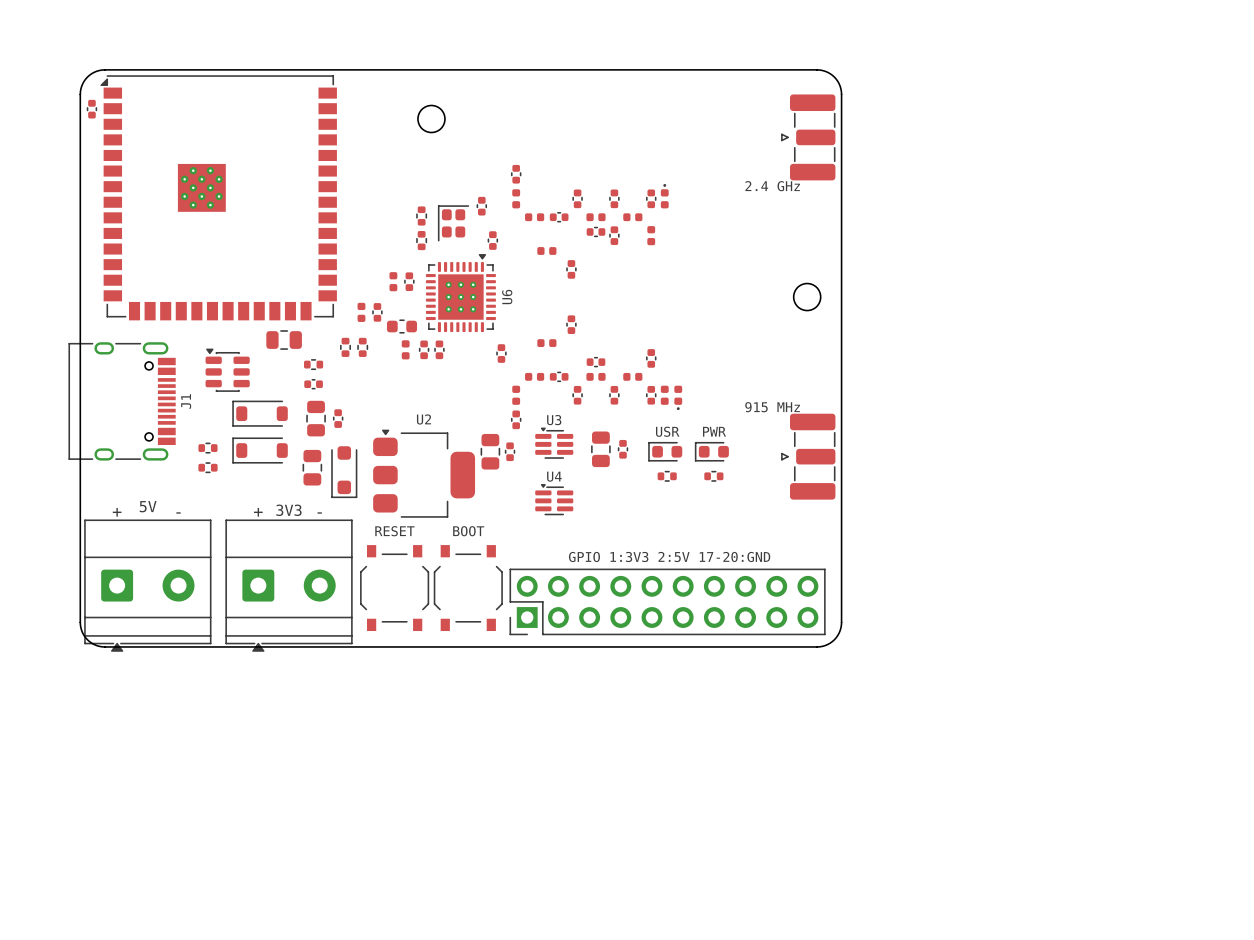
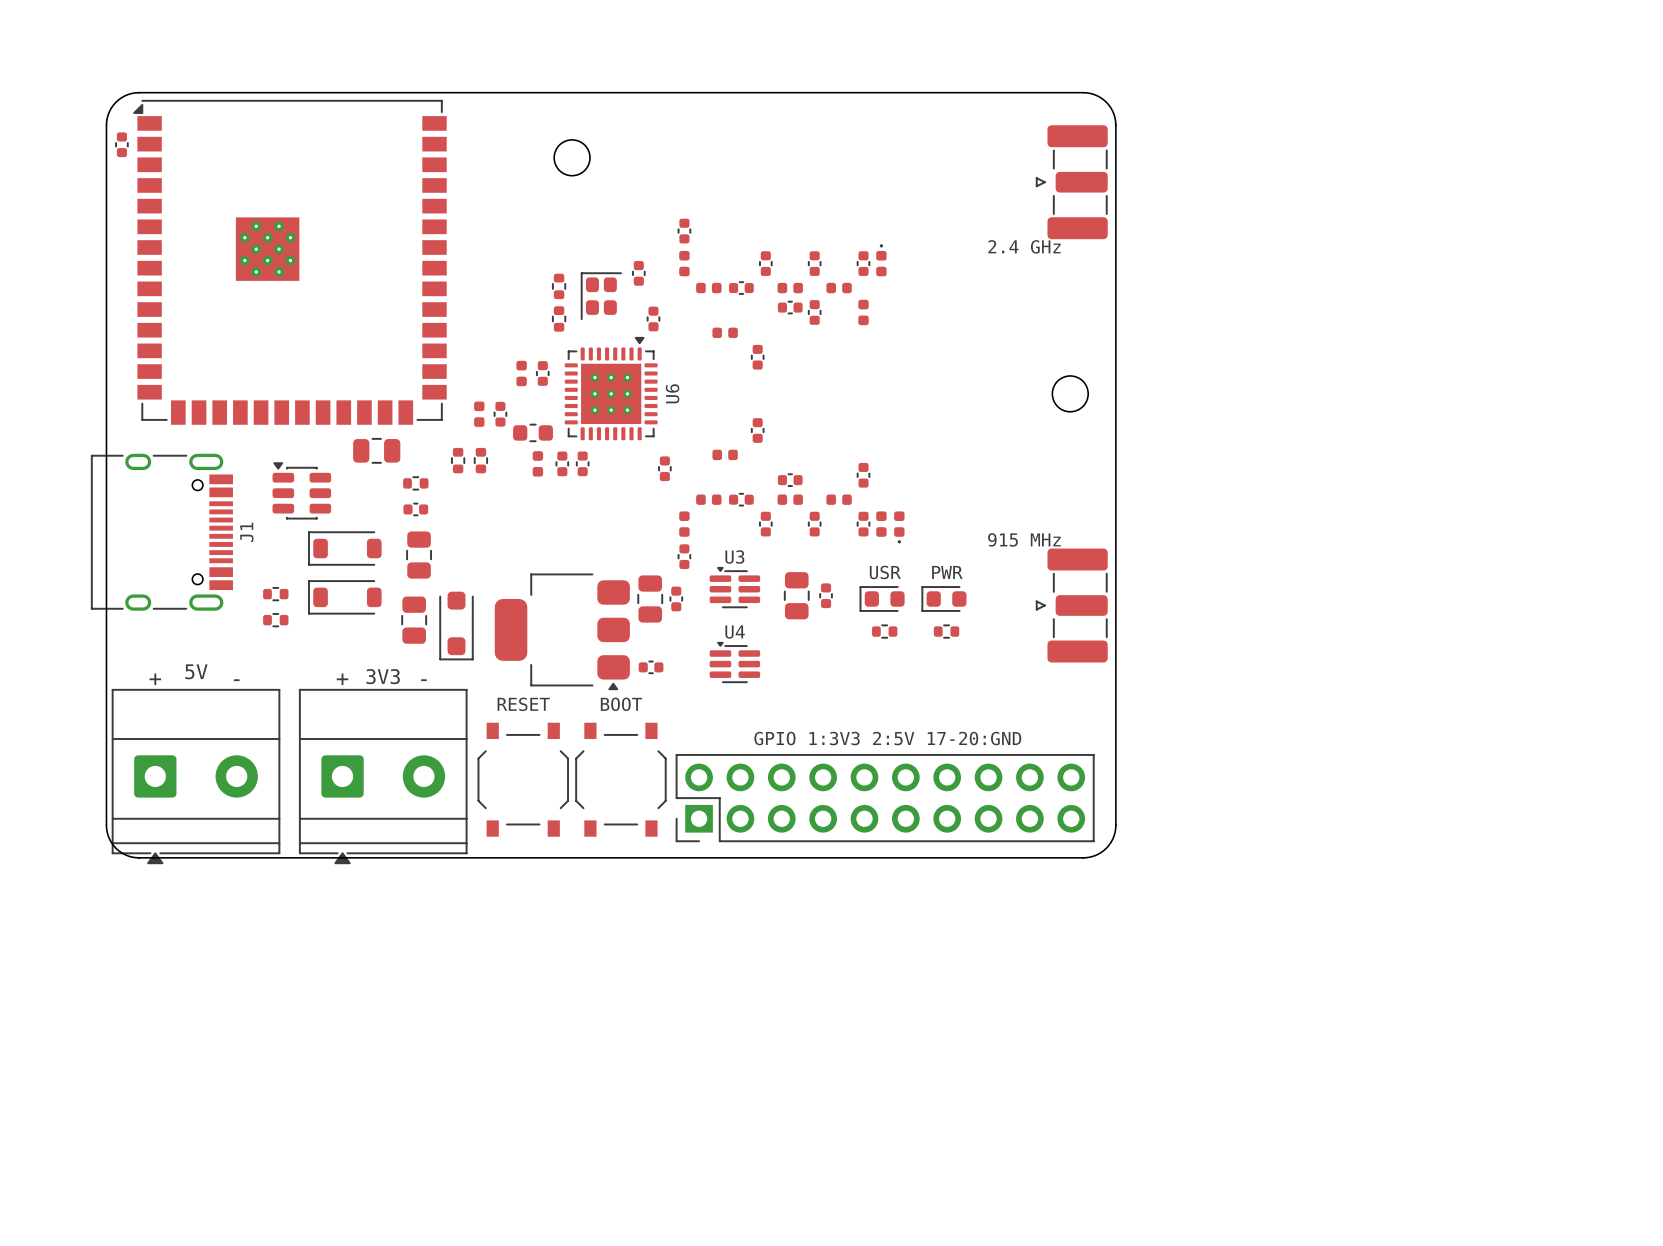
part rotation: 0° (338, 418) -> 90° clockwise (651, 667)
part position: (338, 418) -> (651, 667)
U2: (424, 473) -> none
part: none -> (562, 631)

